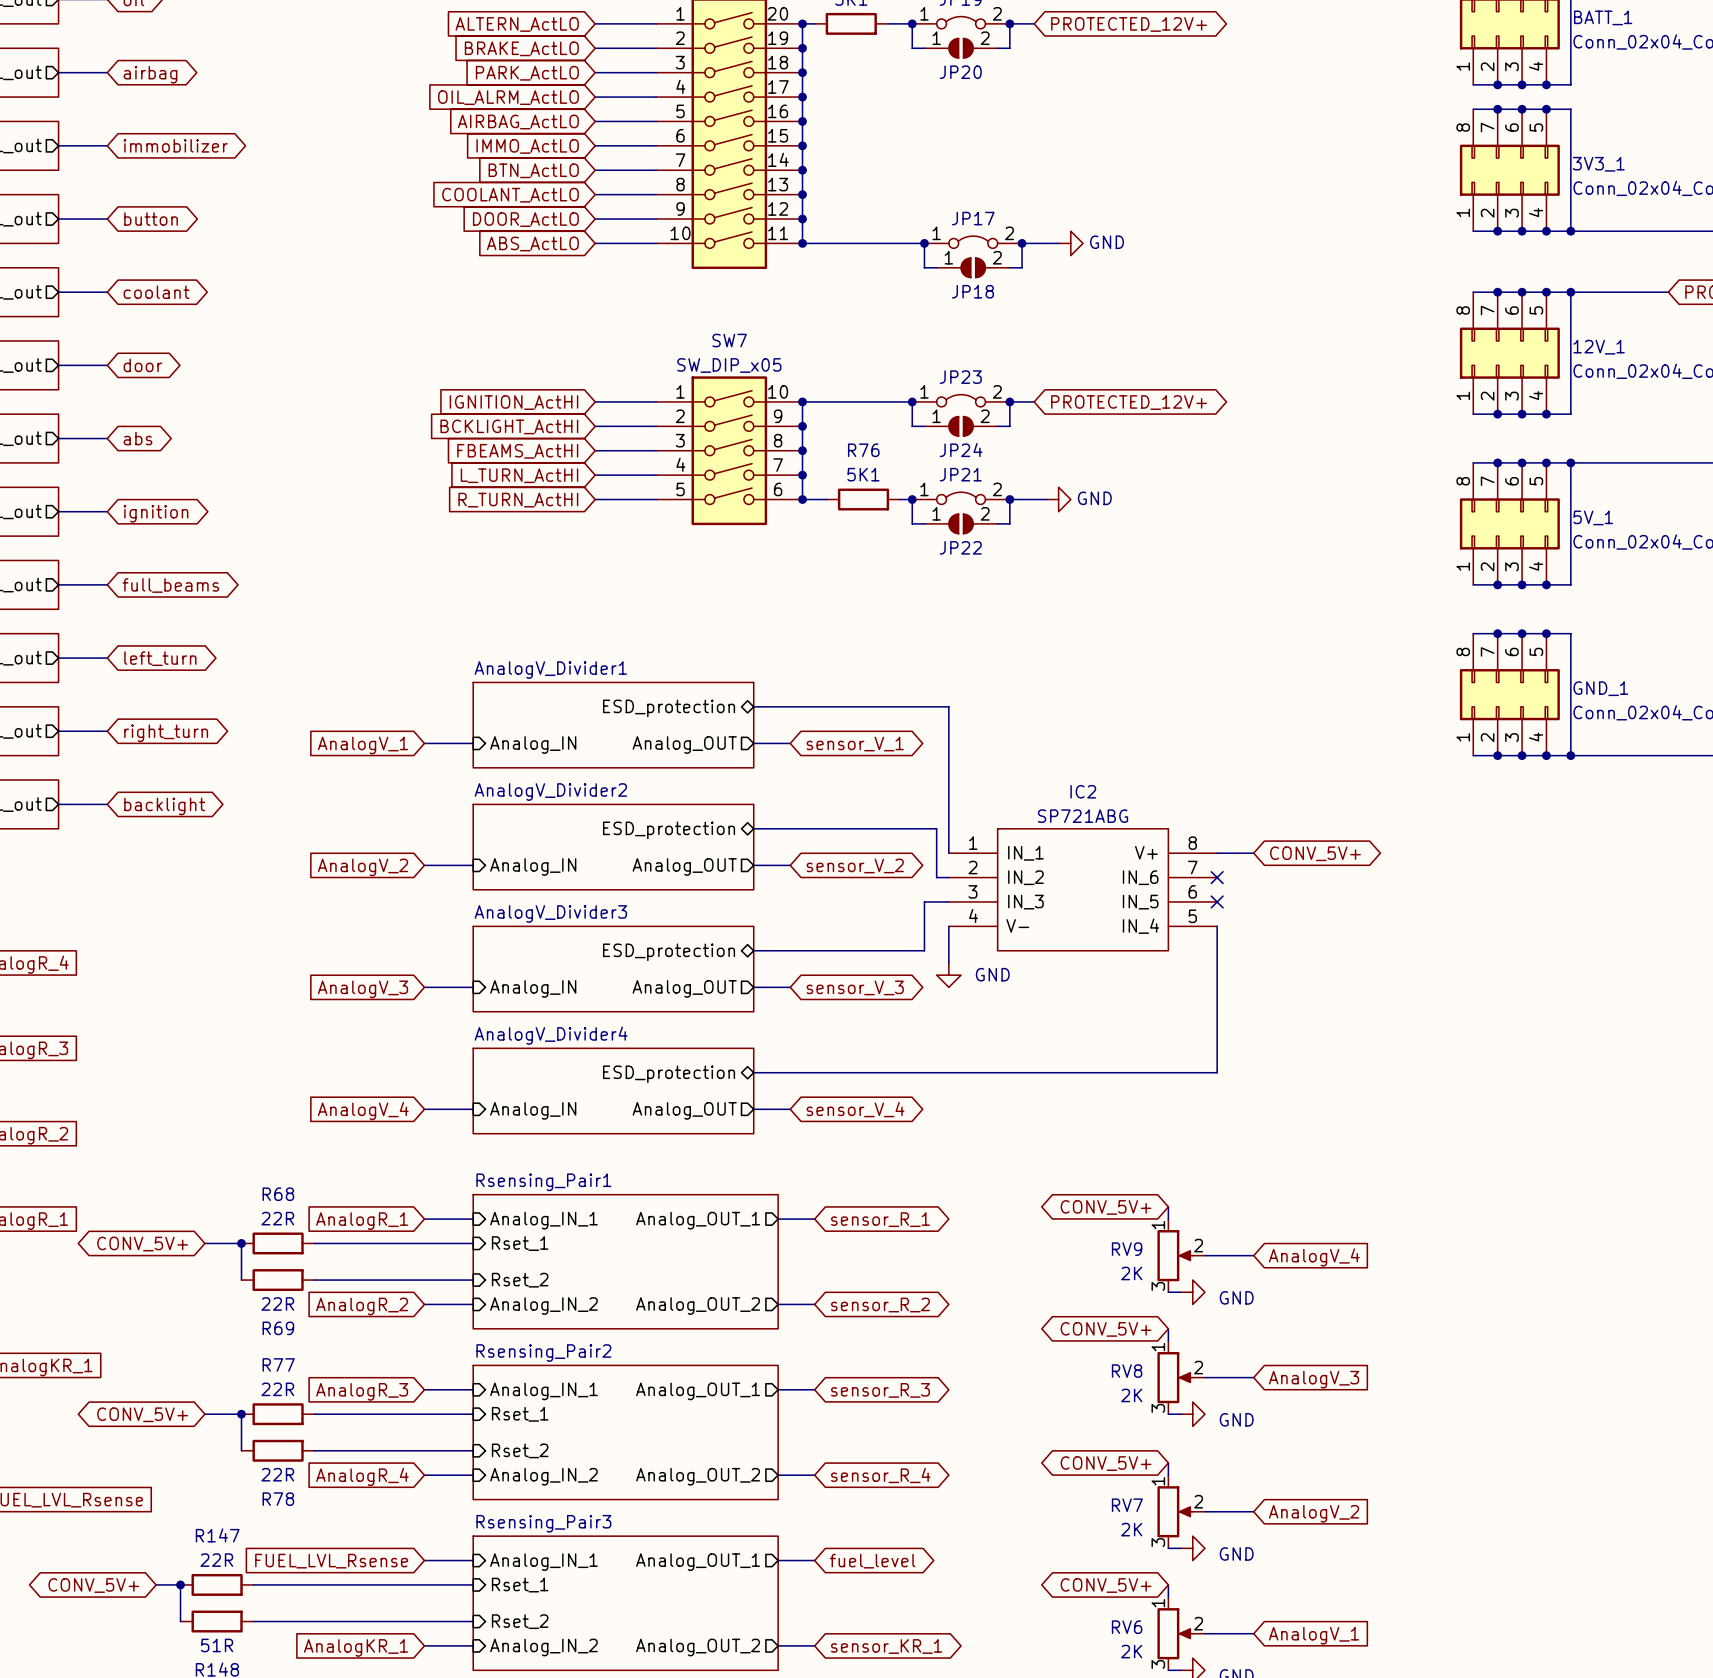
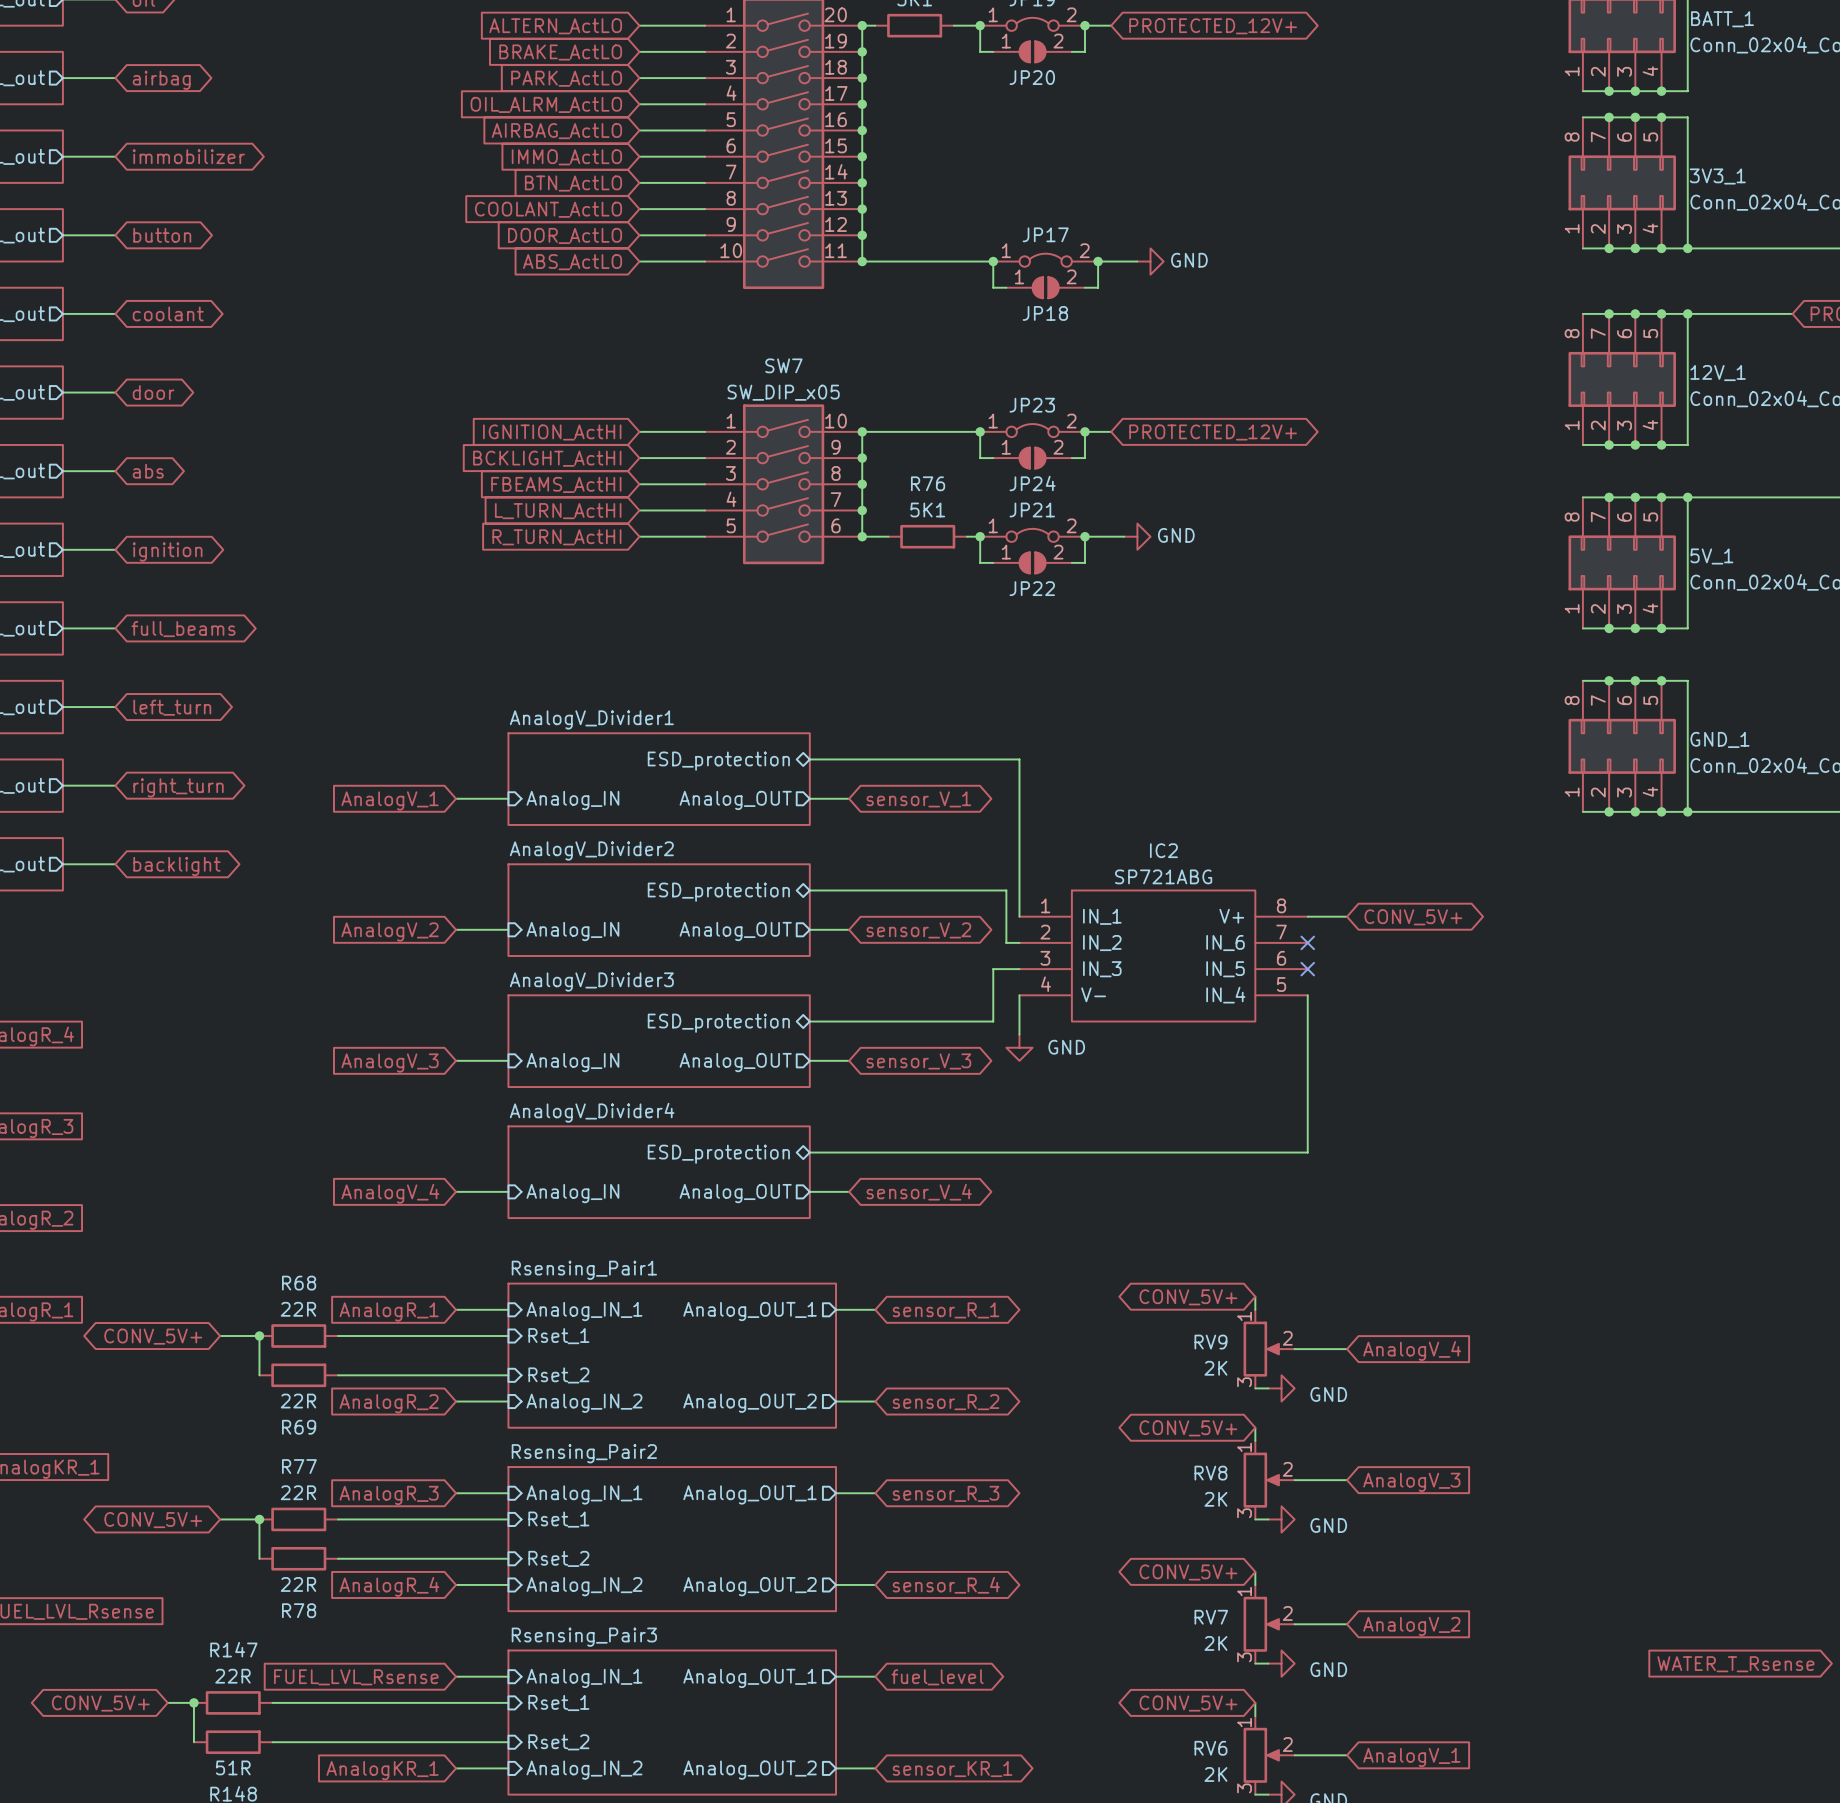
global label: none -> WATER_T_Rsense (1735, 1664)

